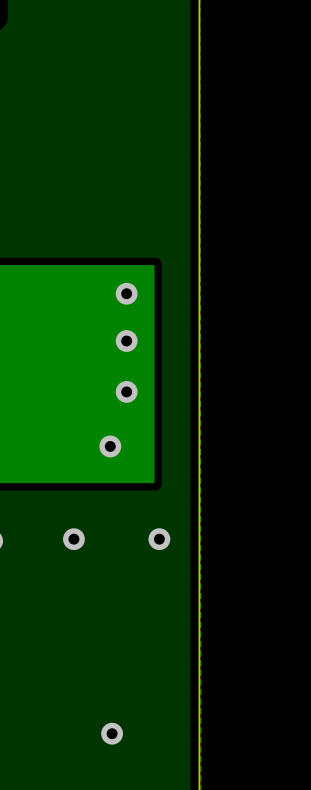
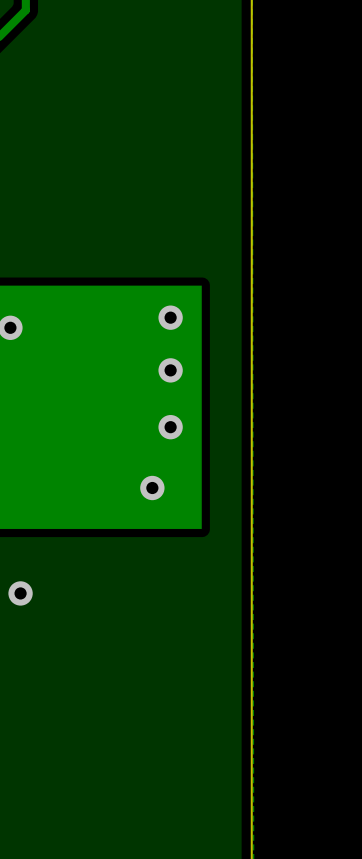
via: (73, 539) -> none
via: (159, 539) -> none
via: (112, 733) -> none

